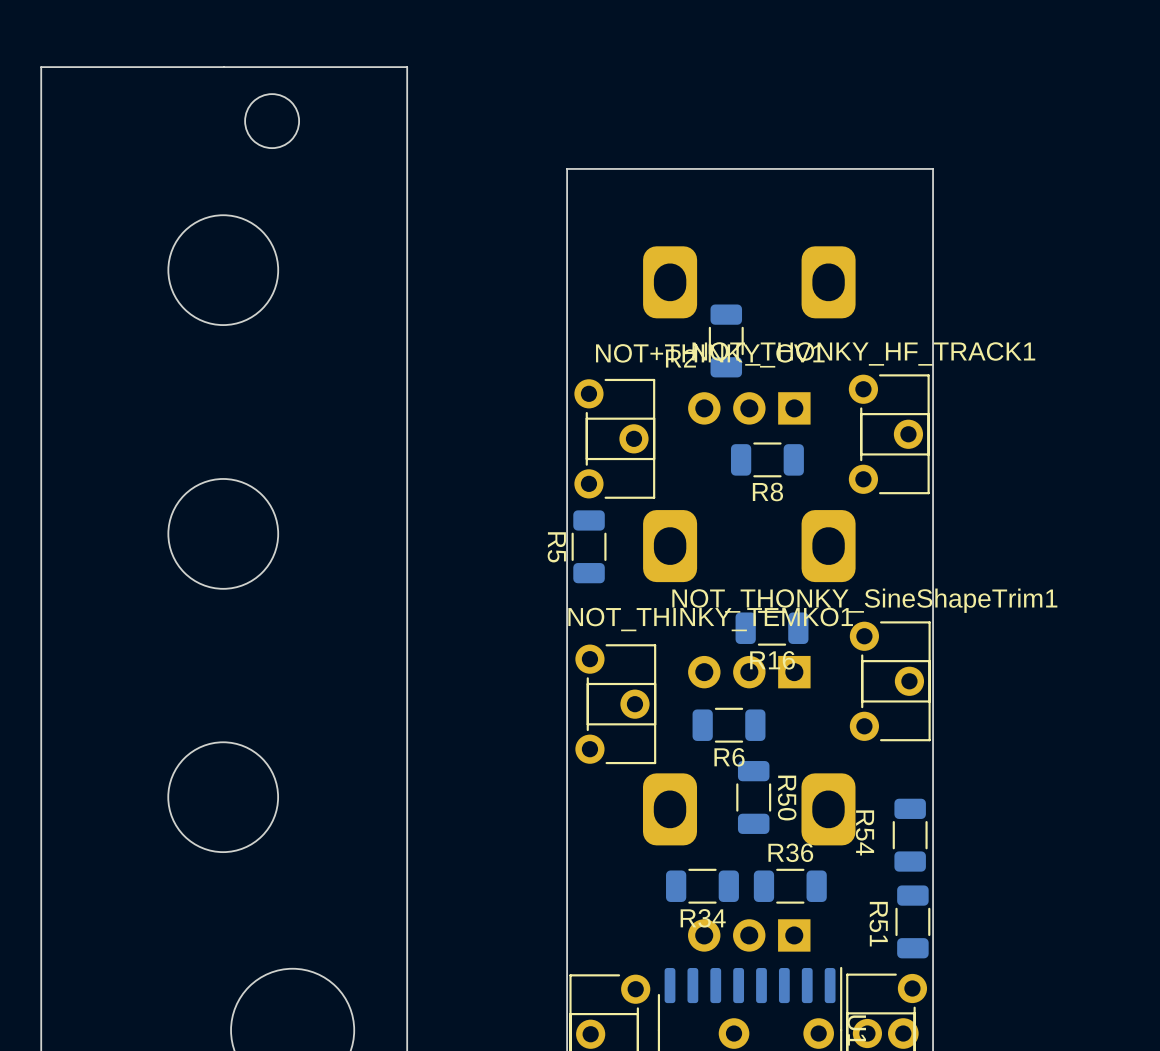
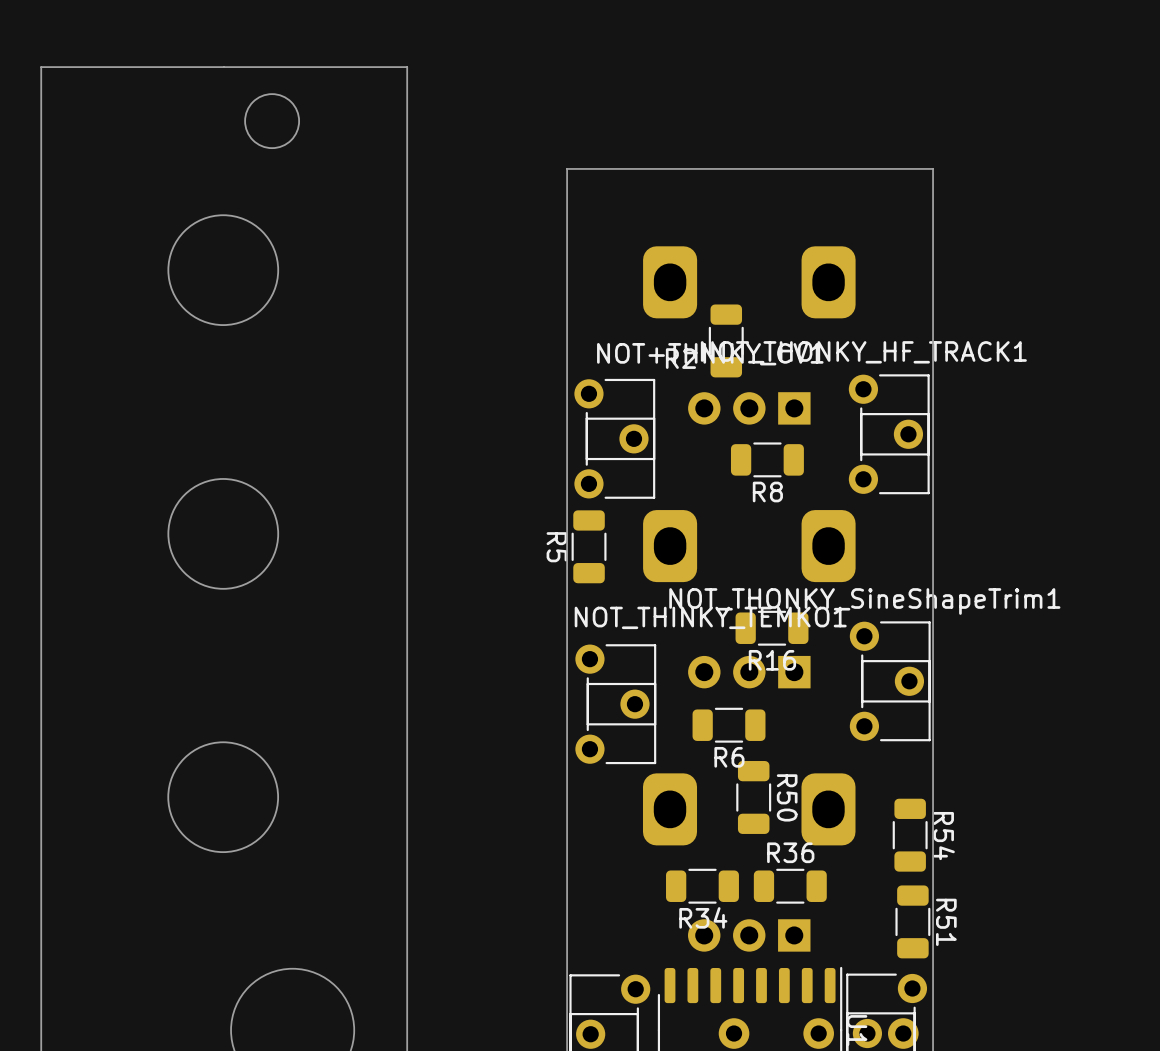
R54 name position: R54 (864, 832) -> R54 (944, 836)
R51 name position: R51 (878, 924) -> R51 (946, 922)

